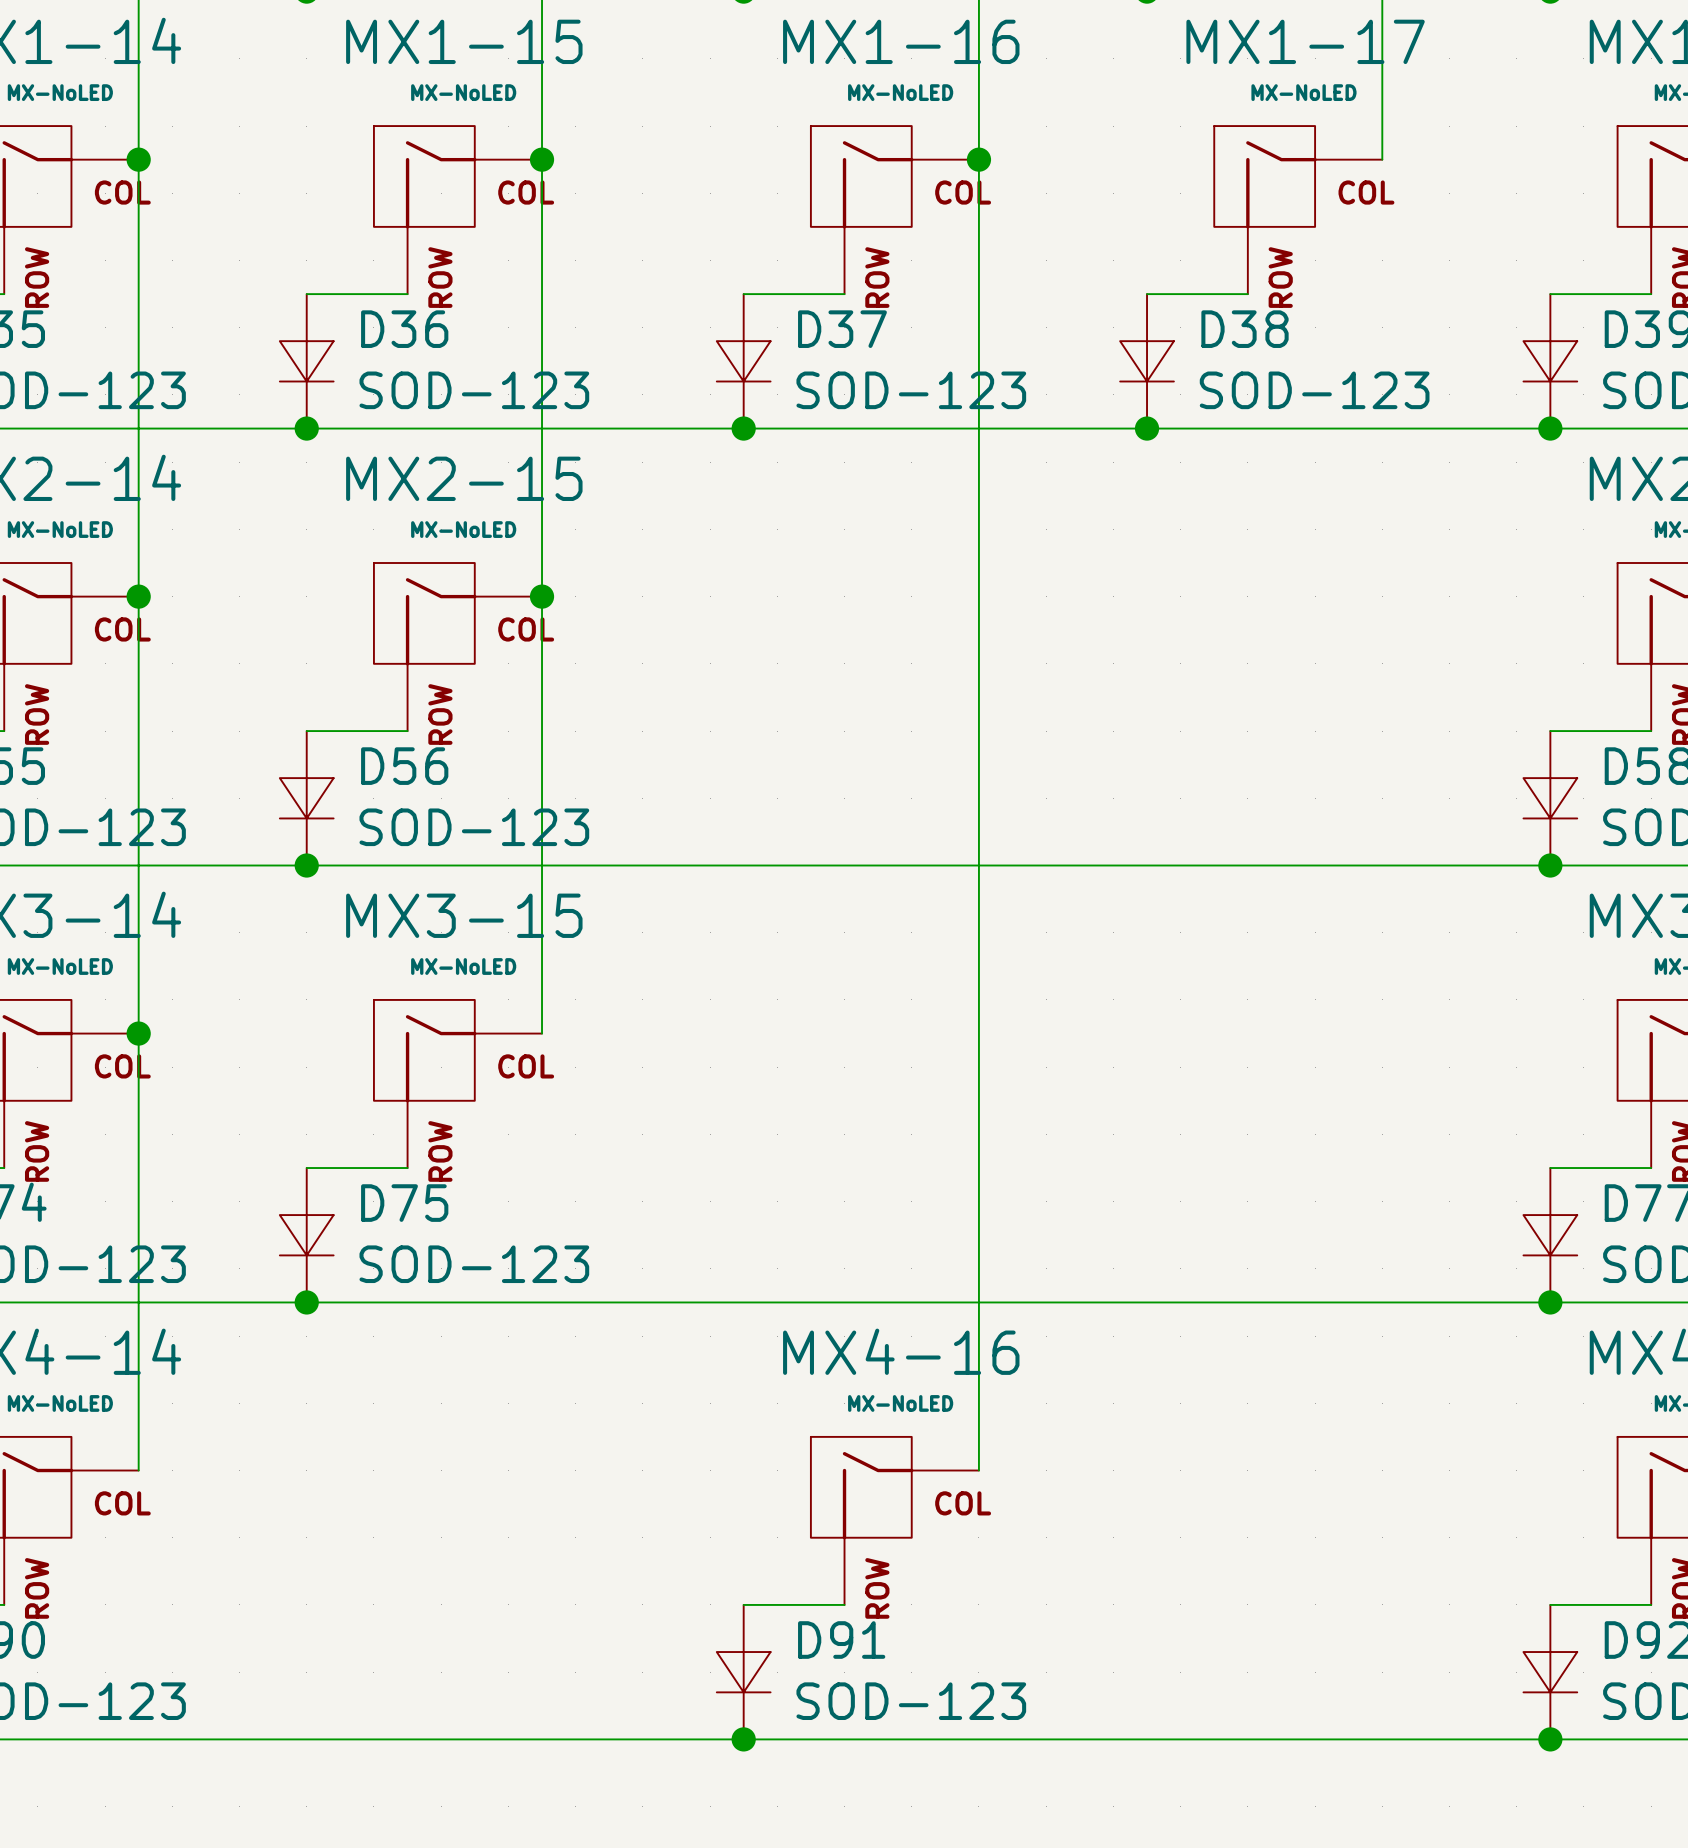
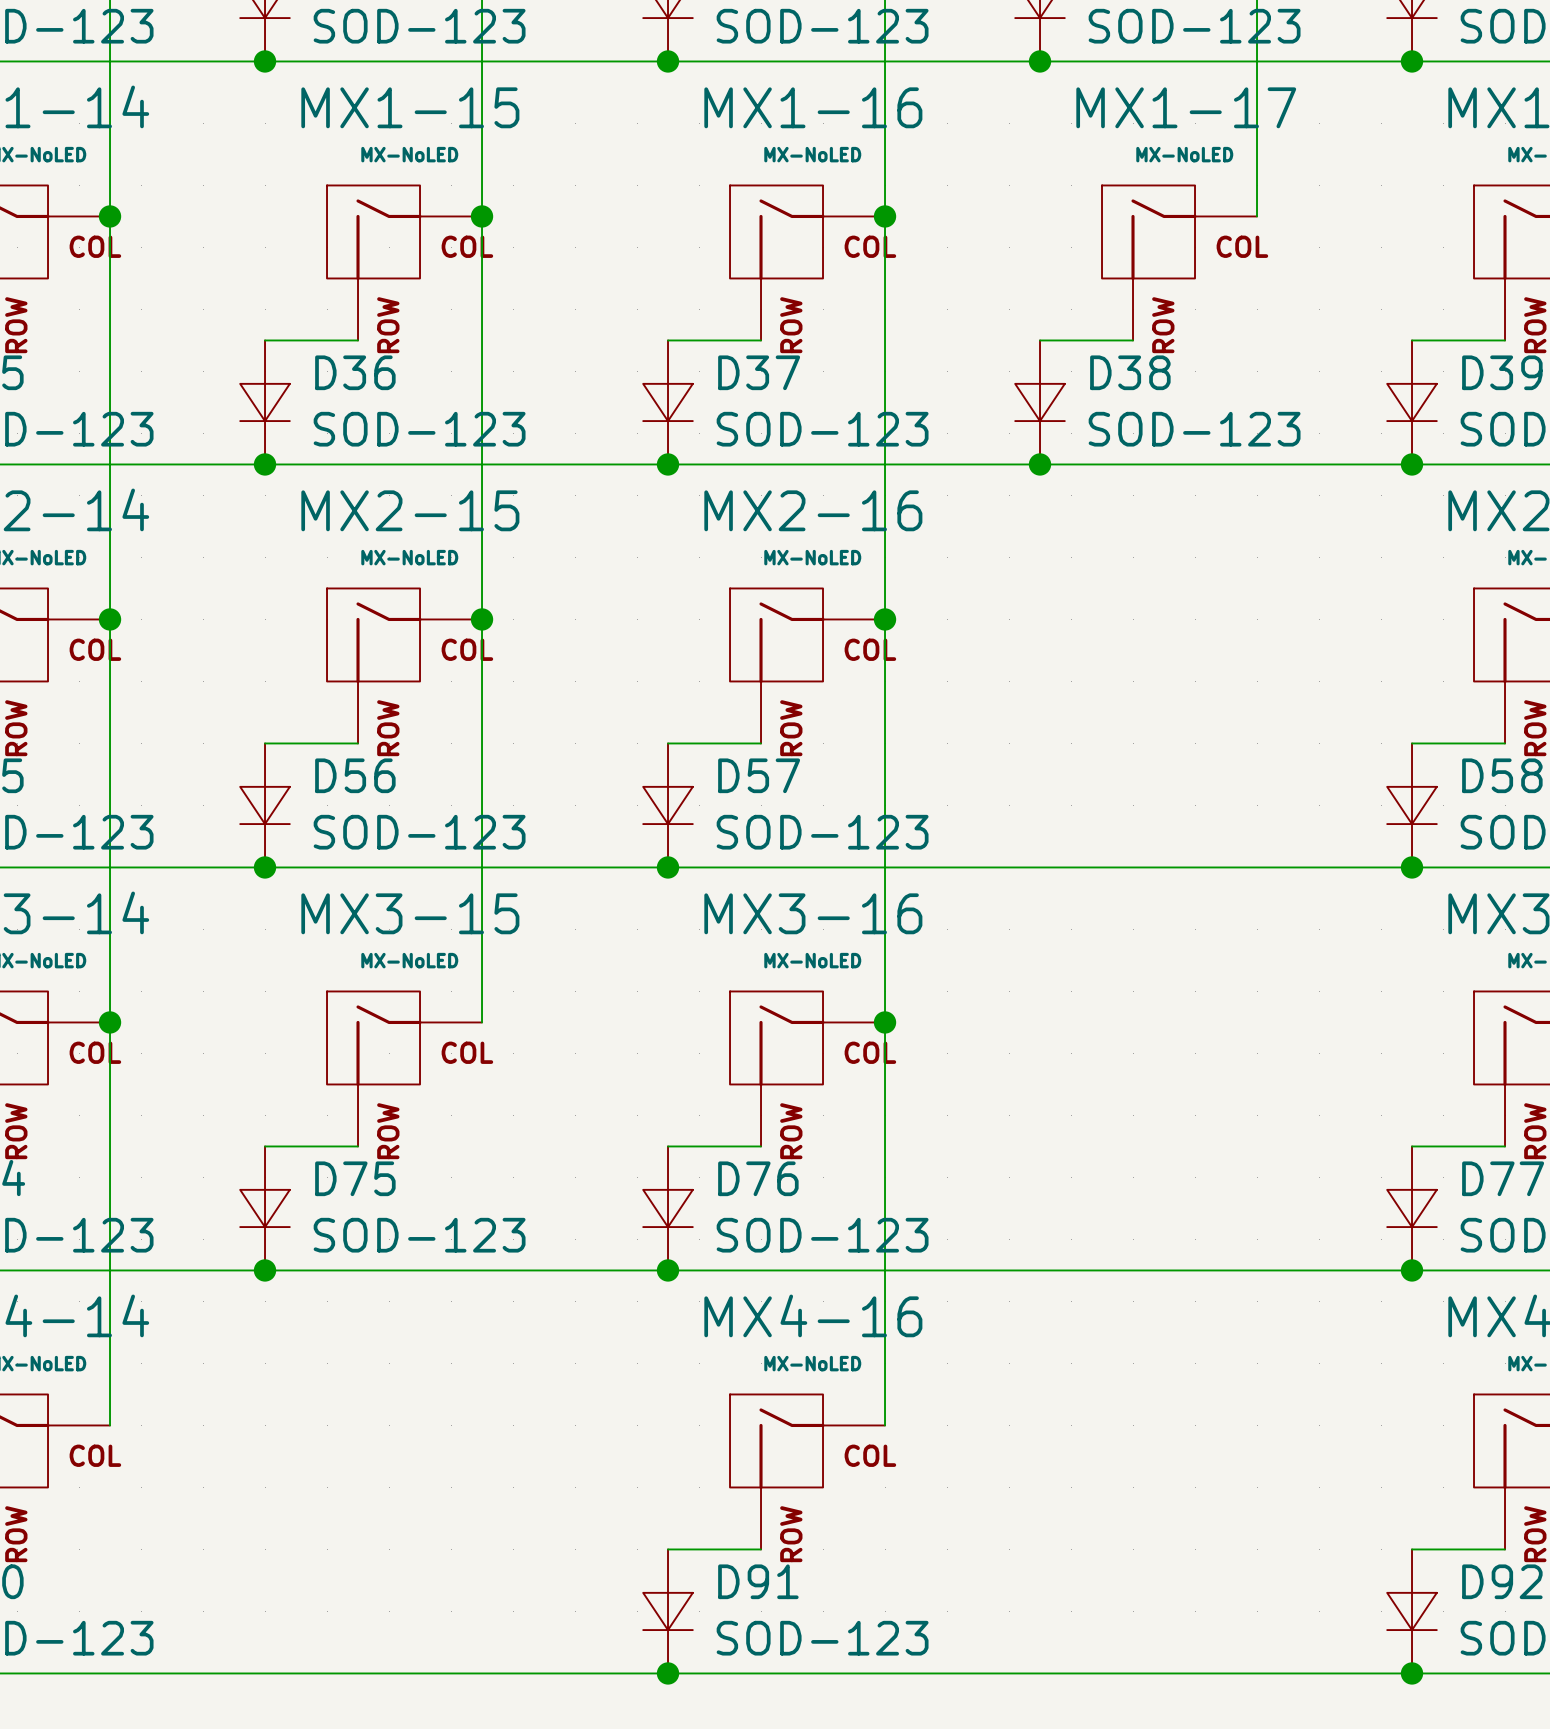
junction: none -> (885, 619)
MX2-16: none -> MX-NoLED (807, 665)
wire: none -> (668, 743) (761, 743)
D57: none -> SOD-123 (668, 805)
junction: none -> (668, 867)
junction: none -> (885, 1022)
MX3-16: none -> MX-NoLED (807, 1068)
wire: none -> (668, 1146) (761, 1146)
D76: none -> SOD-123 (668, 1208)
junction: none -> (668, 1270)

